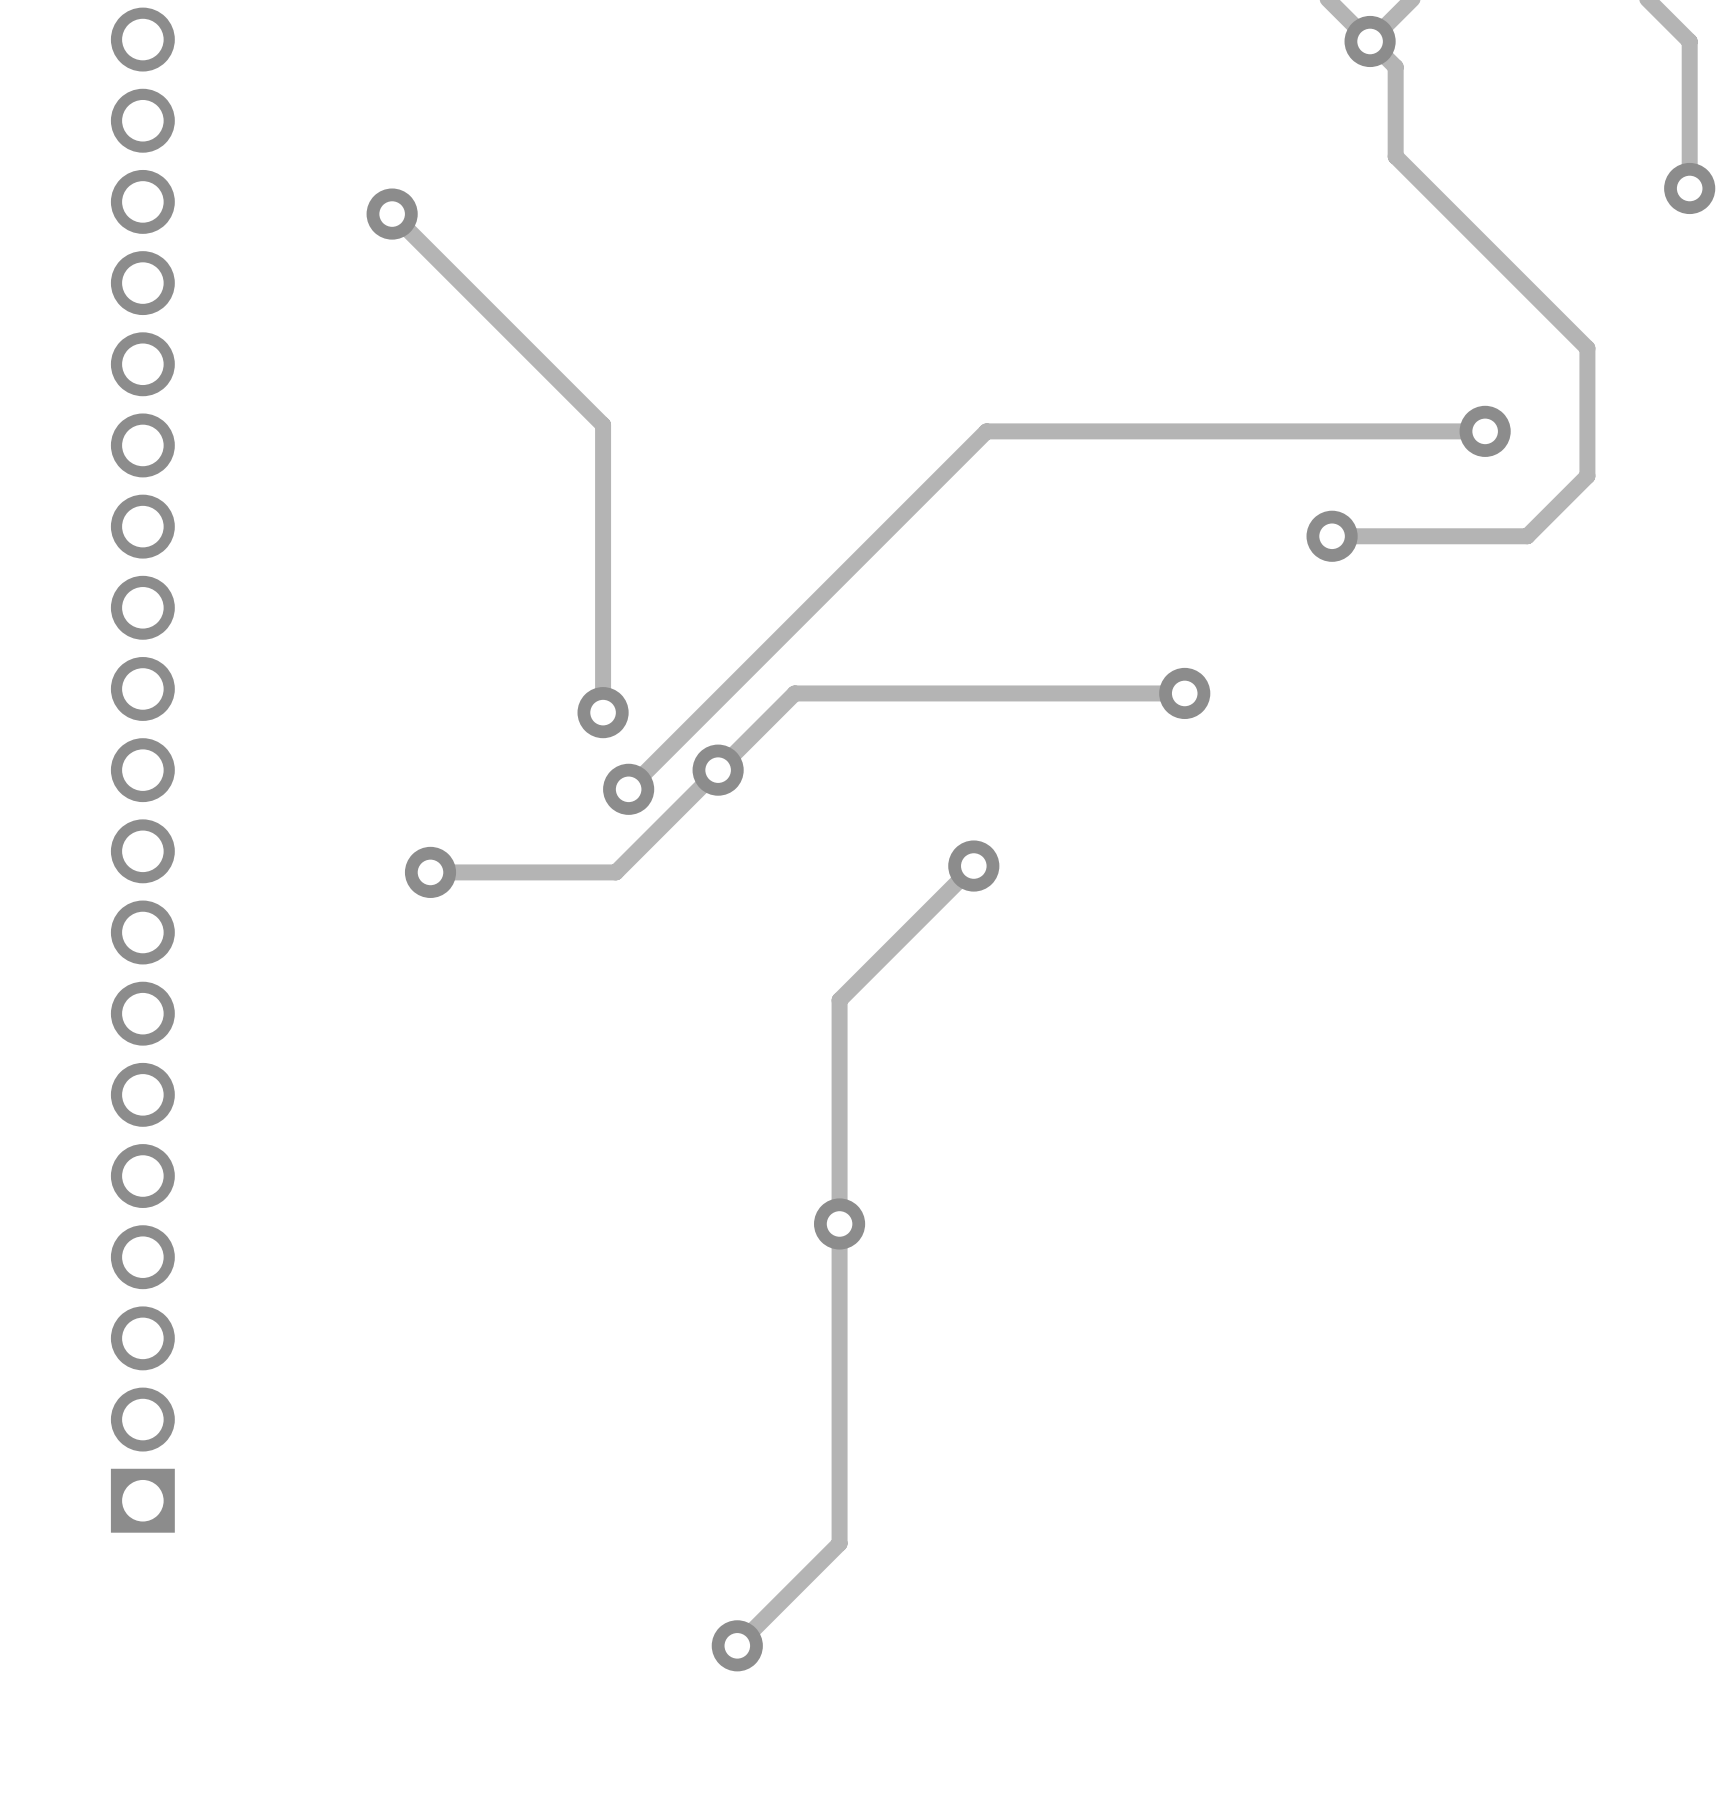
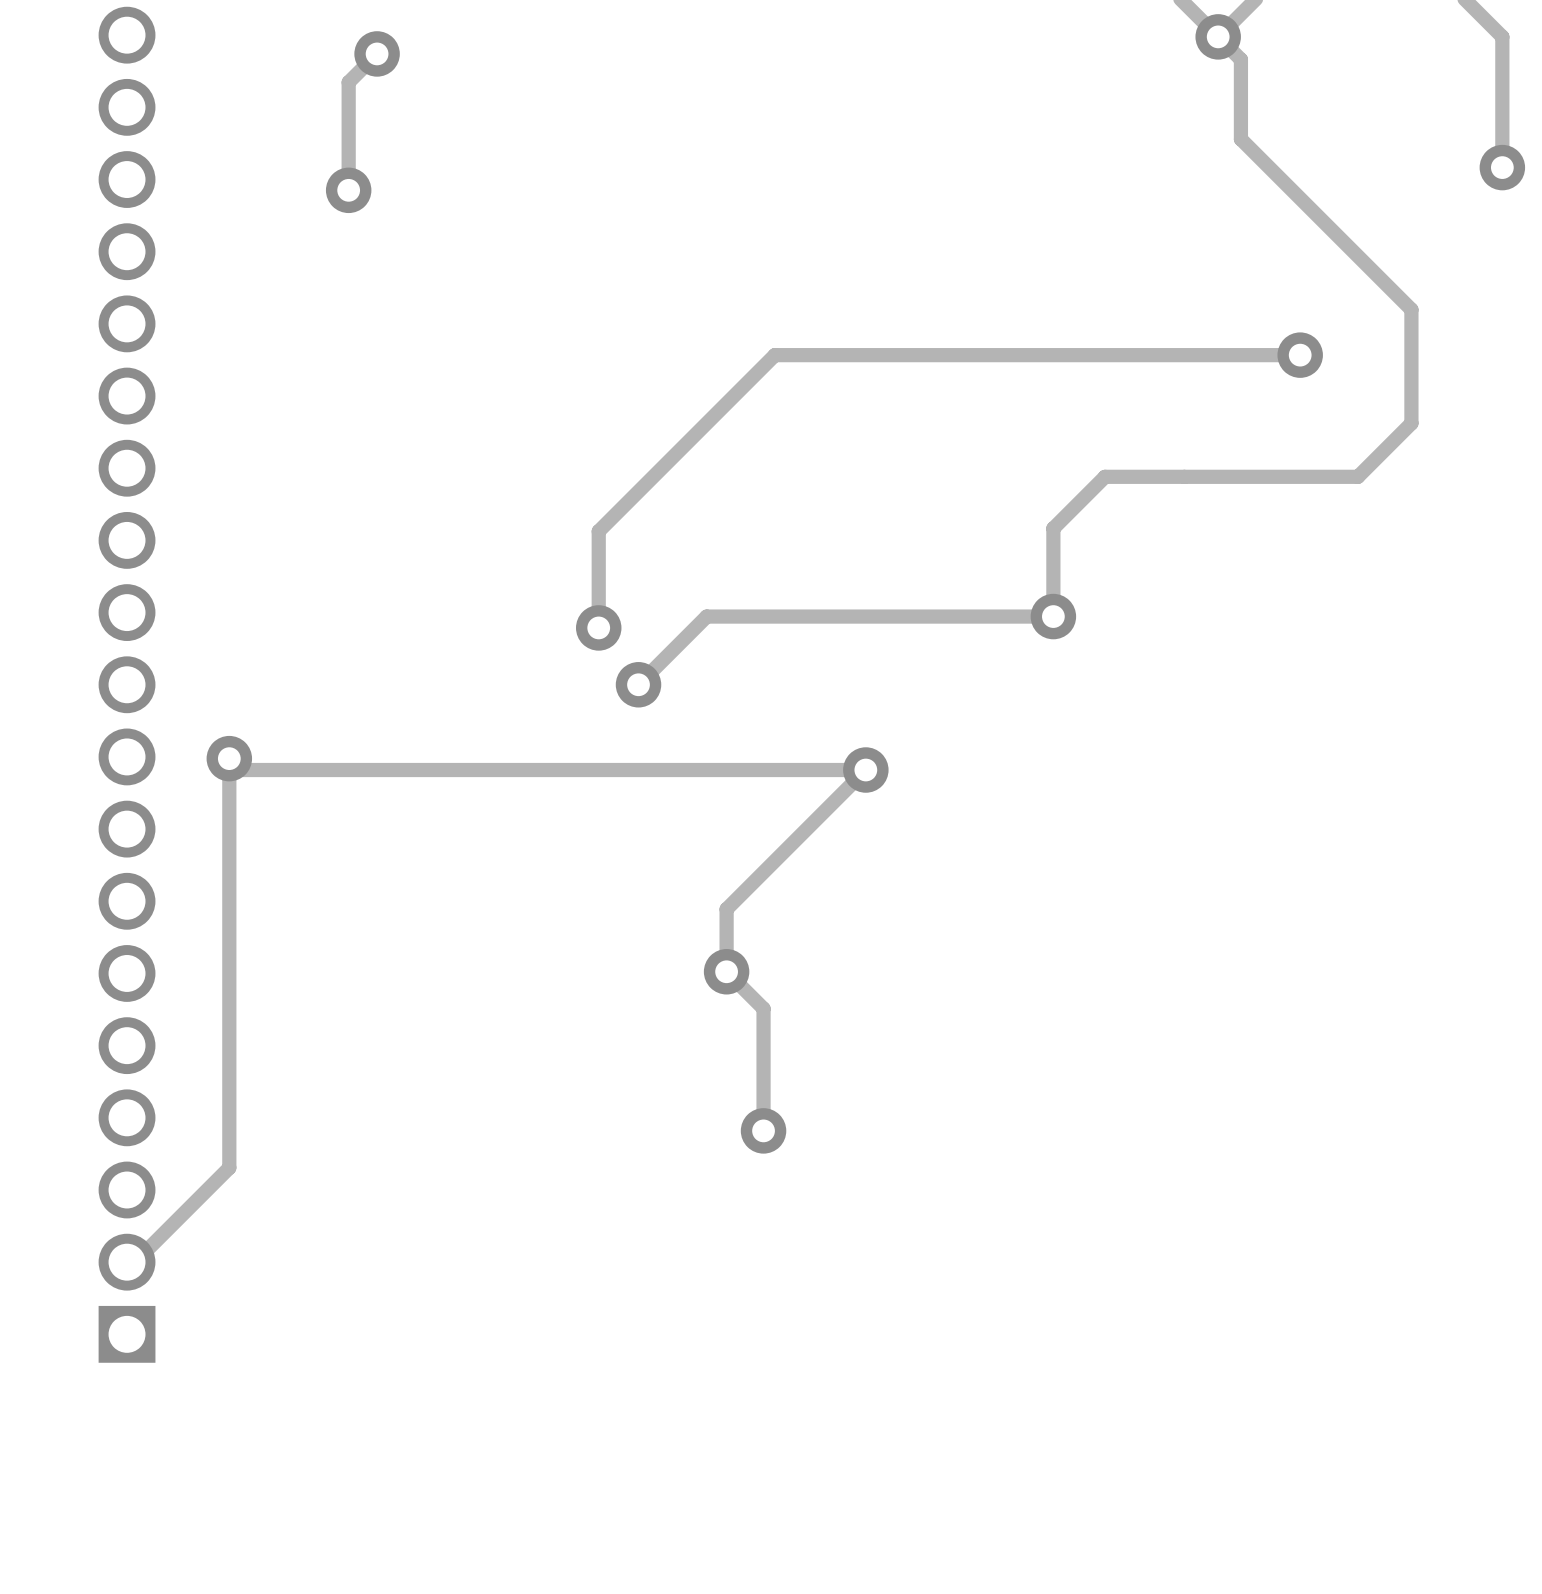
via: none -> (377, 53)
track: (392, 214) (603, 424) (603, 712) -> (348, 190) (348, 82) (377, 53)
track: none -> (1300, 355) (774, 355) (598, 531) (598, 627)
track: (1485, 431) (986, 431) (628, 789) -> none
via position: (1485, 431) -> (1300, 355)
track: none -> (1184, 476) (1105, 476) (1053, 528) (1053, 616)
via: (1332, 536) -> none
via: none -> (598, 627)
via: (603, 712) -> none
track: (718, 770) (615, 872) (430, 872) -> none
via: (628, 789) -> none
via: none -> (229, 758)
track: none -> (865, 770) (240, 770) (229, 758) (229, 1167) (134, 1262) (127, 1262)
via: (430, 872) -> none
track: (839, 1000) (839, 1543) (737, 1645) -> (746, 889) (726, 909) (726, 971) (763, 1008) (763, 1130)
via: none -> (726, 971)
via position: (839, 1223) -> (763, 1130)
via: (737, 1645) -> none

